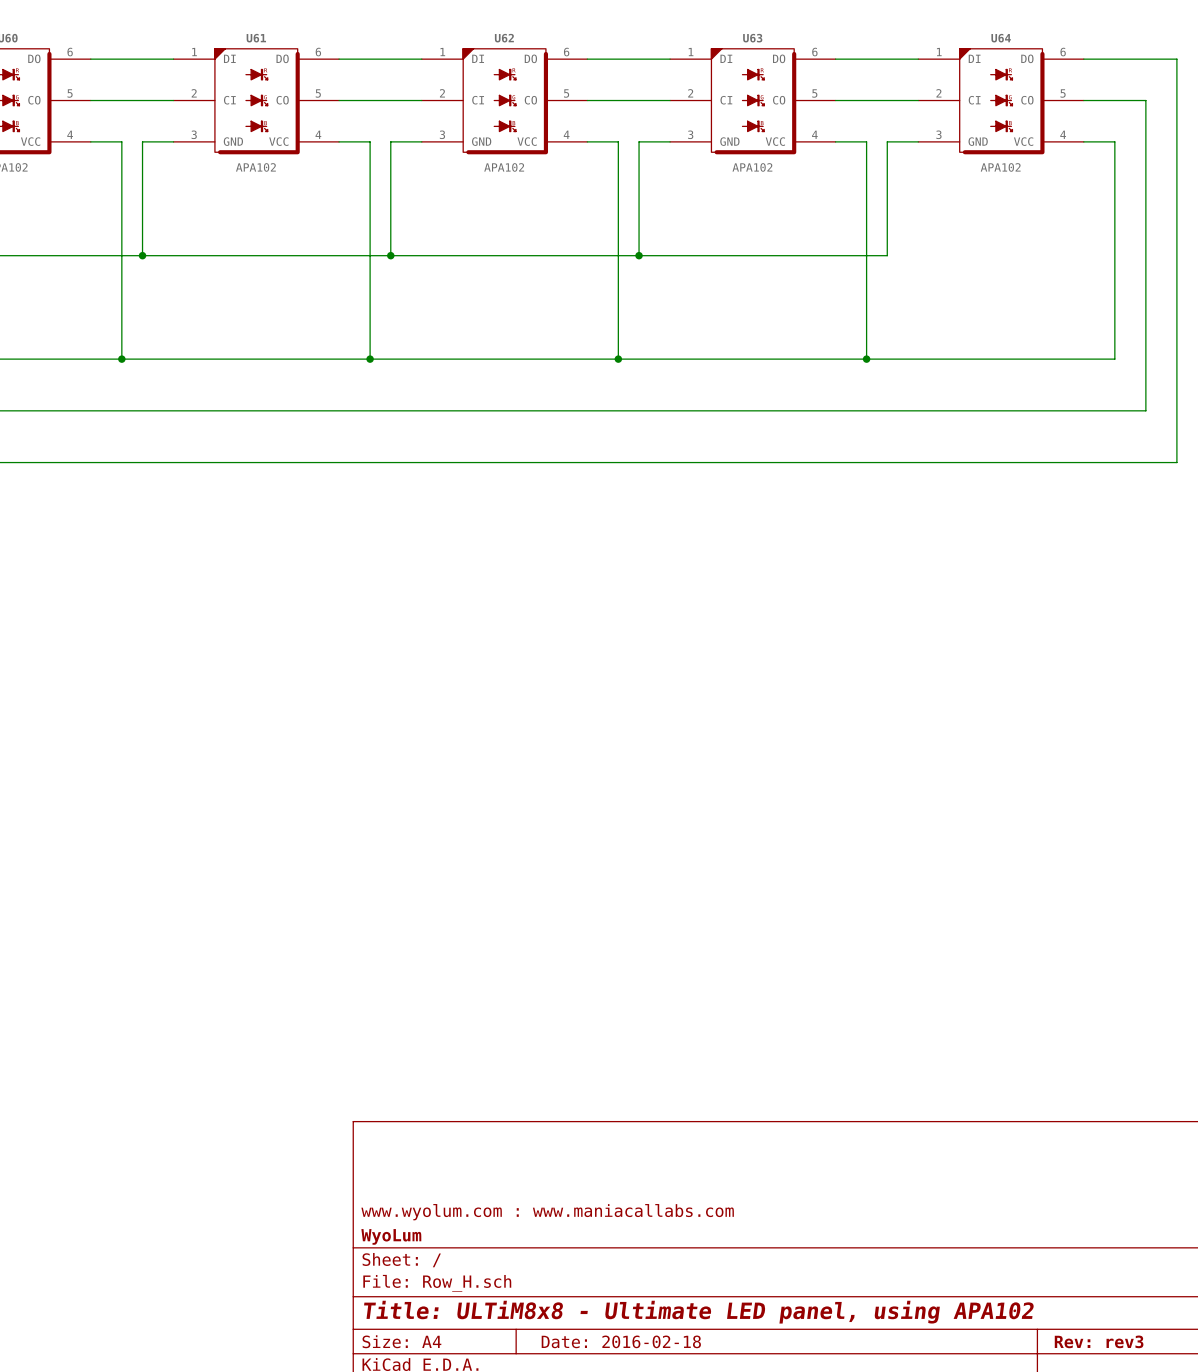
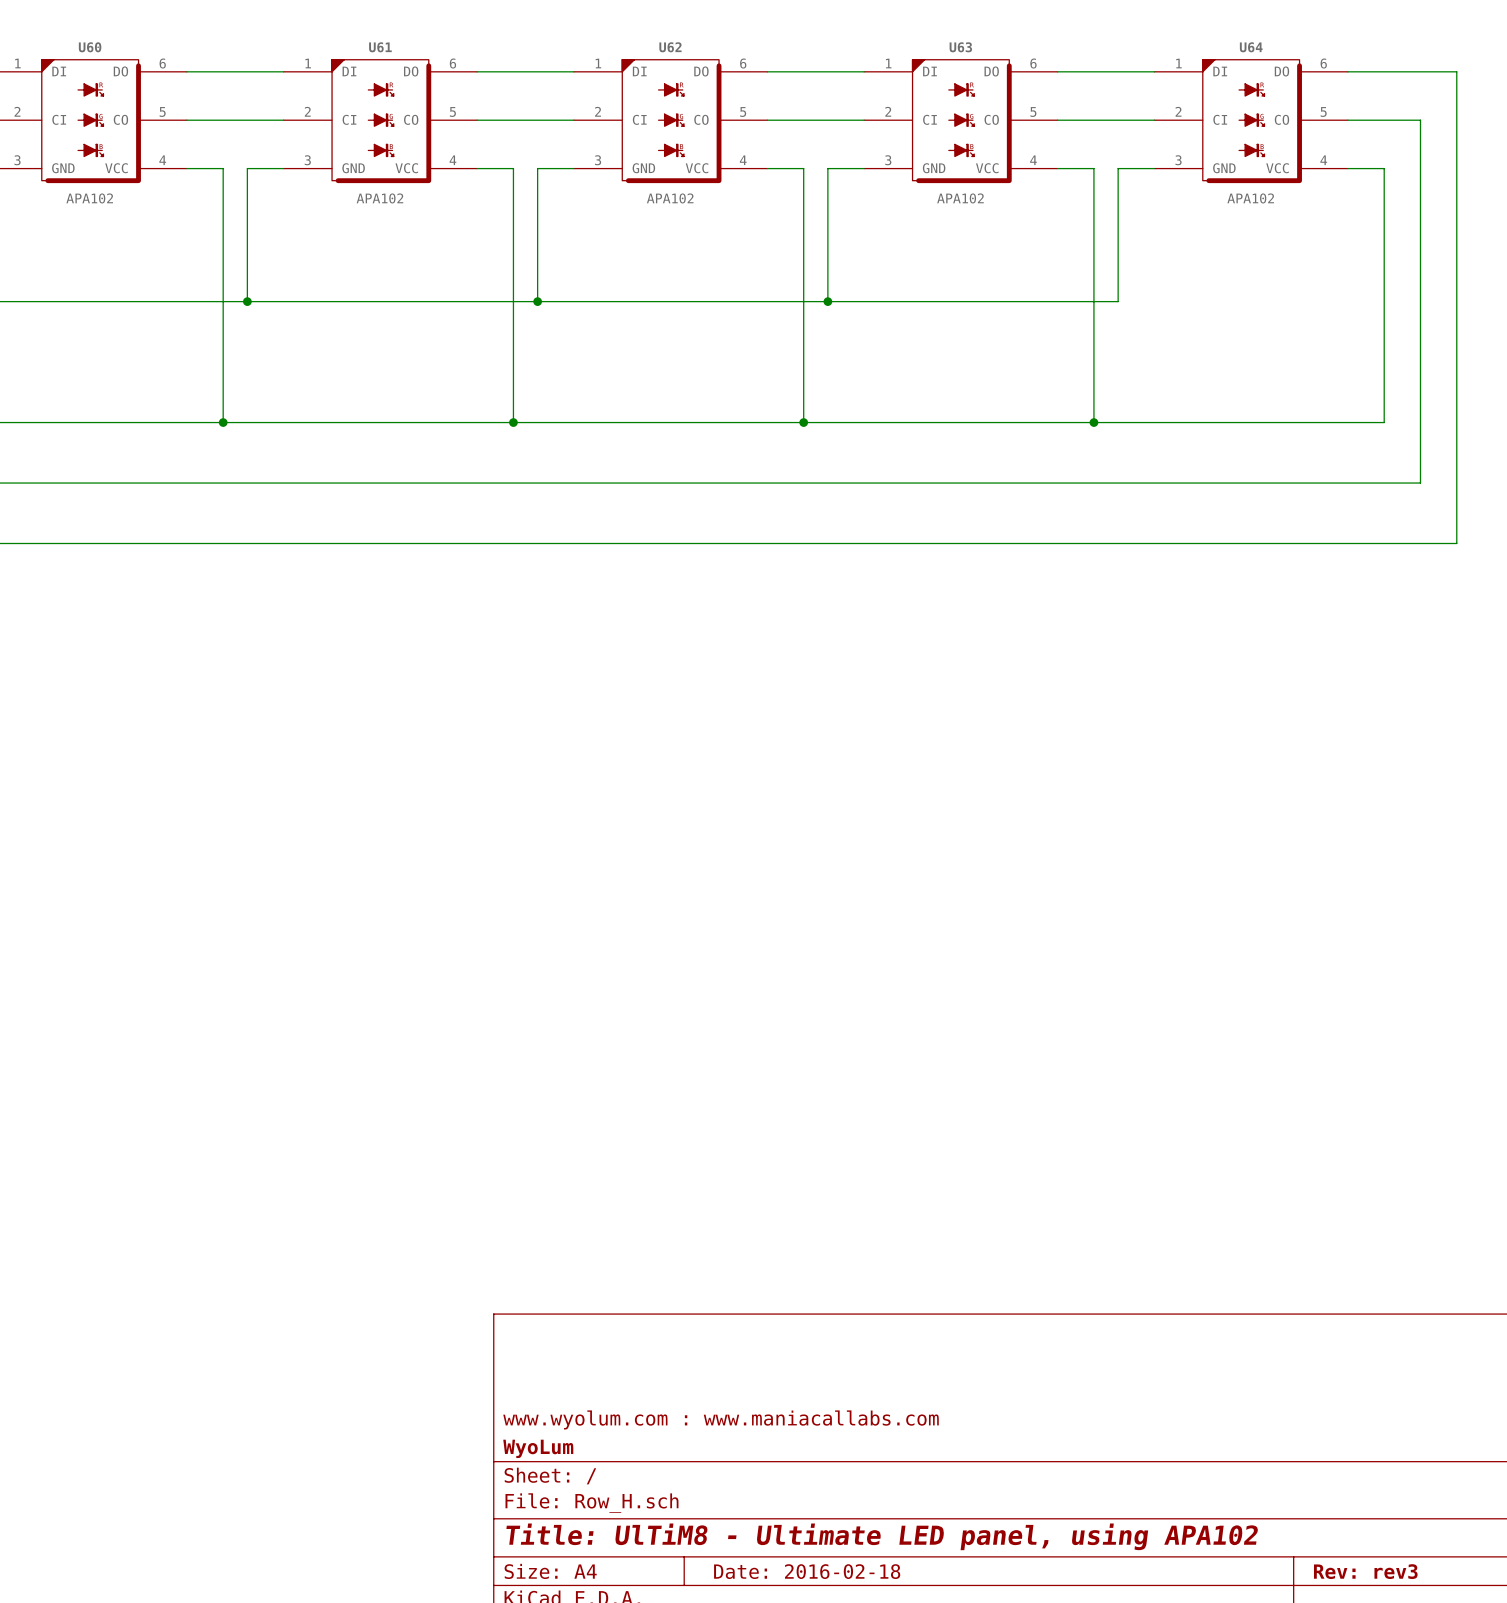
title block: Title: ULTiM8x8 - Ultimate LED panel, using APA102 (698, 1312) -> Title: UlTiM8 - Ultimate LED panel, using APA102 (882, 1536)

